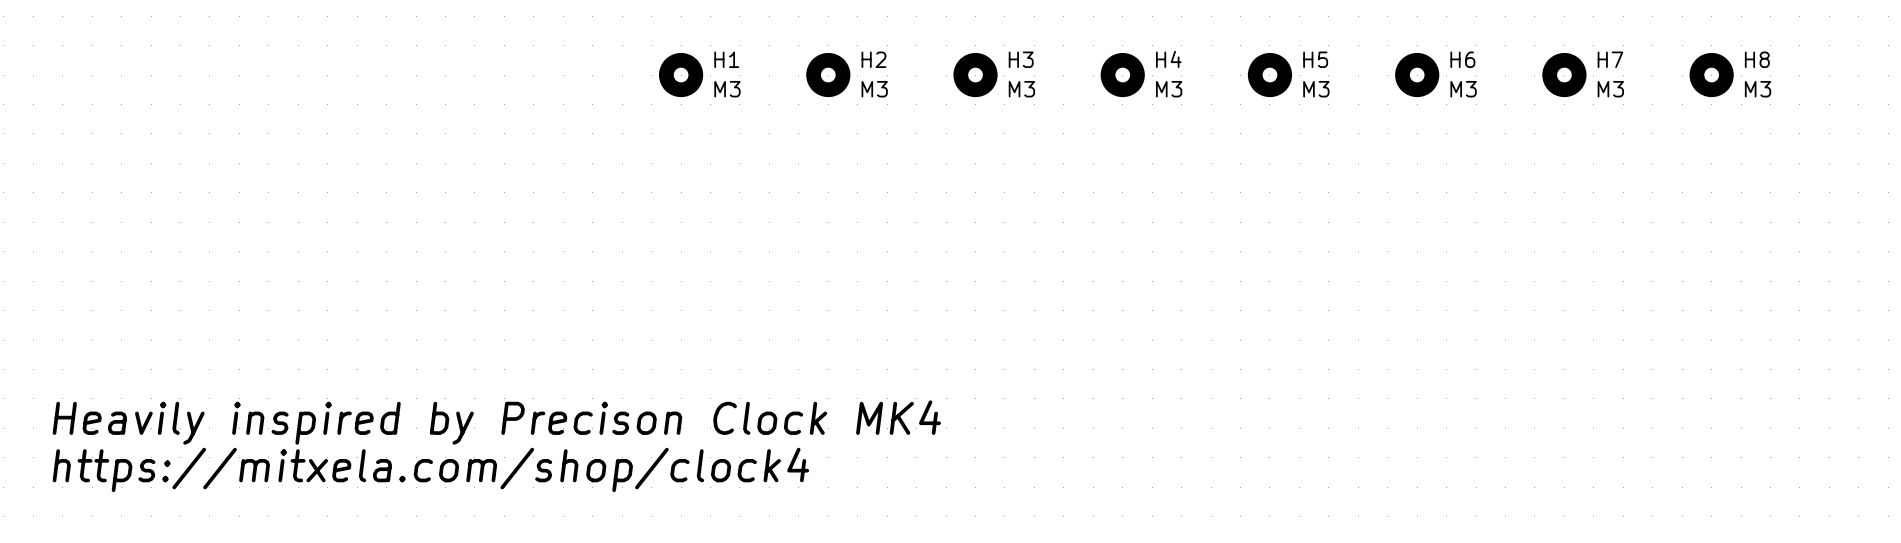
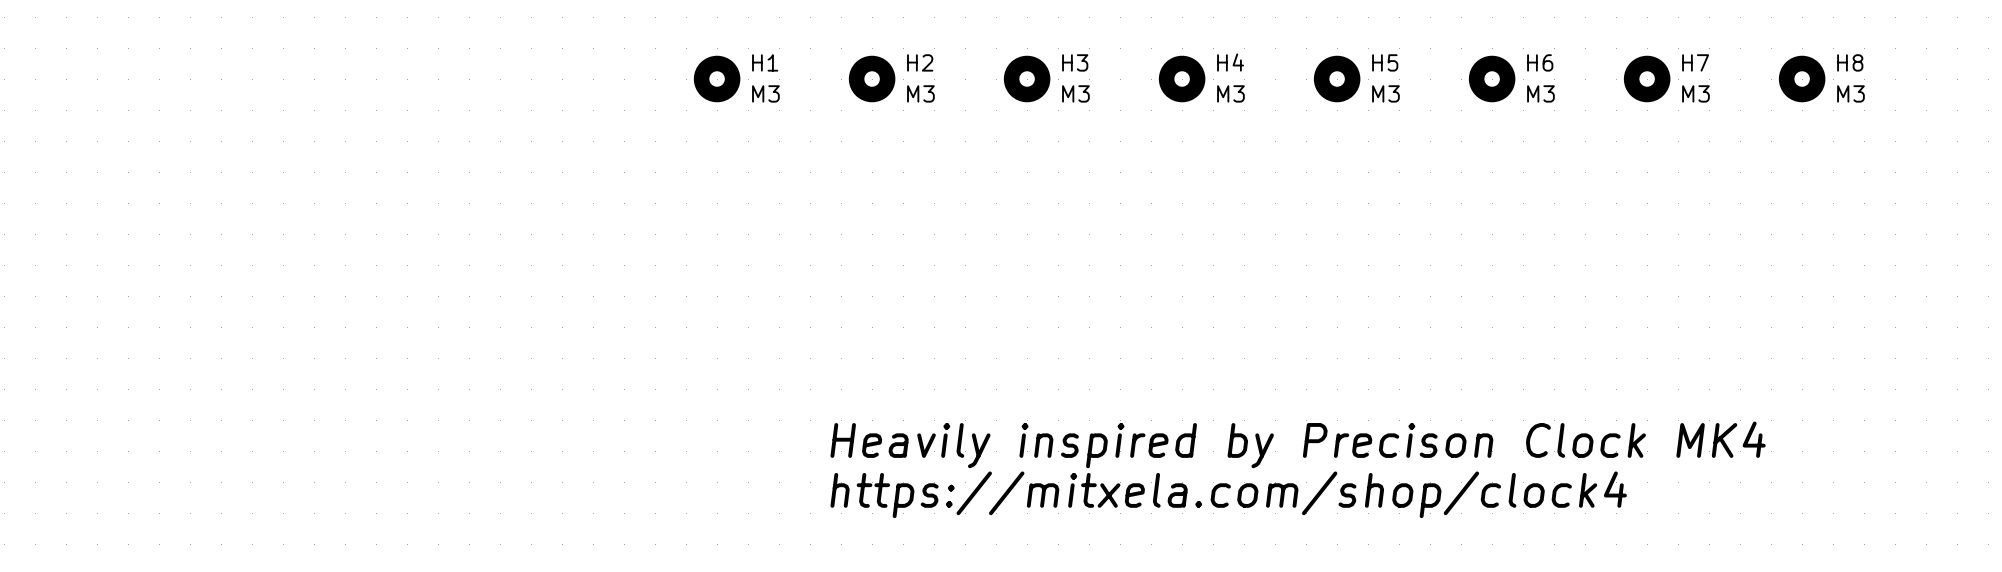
text: Heavily inspired by Precison Clock MK4 (496, 422) -> none
text: none -> Heavily inspired by Precison Clock MK4 (1298, 444)
text: https://mitxela.com/shop/clock4 (430, 469) -> none
text: none -> https://mitxela.com/shop/clock4 (1228, 494)

